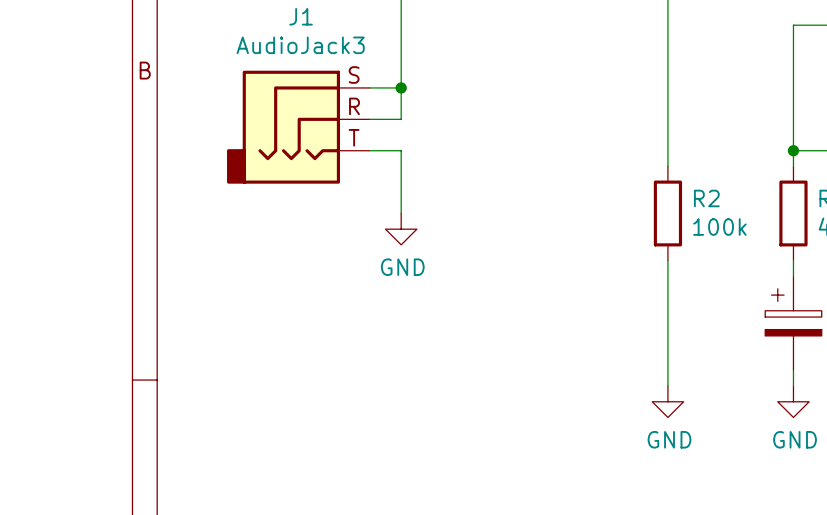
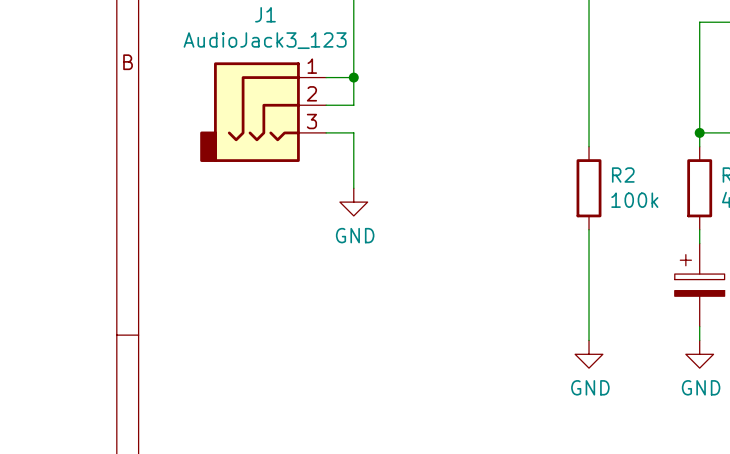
J1 value: AudioJack3 (300, 45) -> AudioJack3_123 (265, 40)
J1 pin number: S (354, 75) -> 1 (312, 66)
J1 pin number: R (354, 106) -> 2 (311, 93)
J1 pin number: T (354, 137) -> 3 (311, 121)

